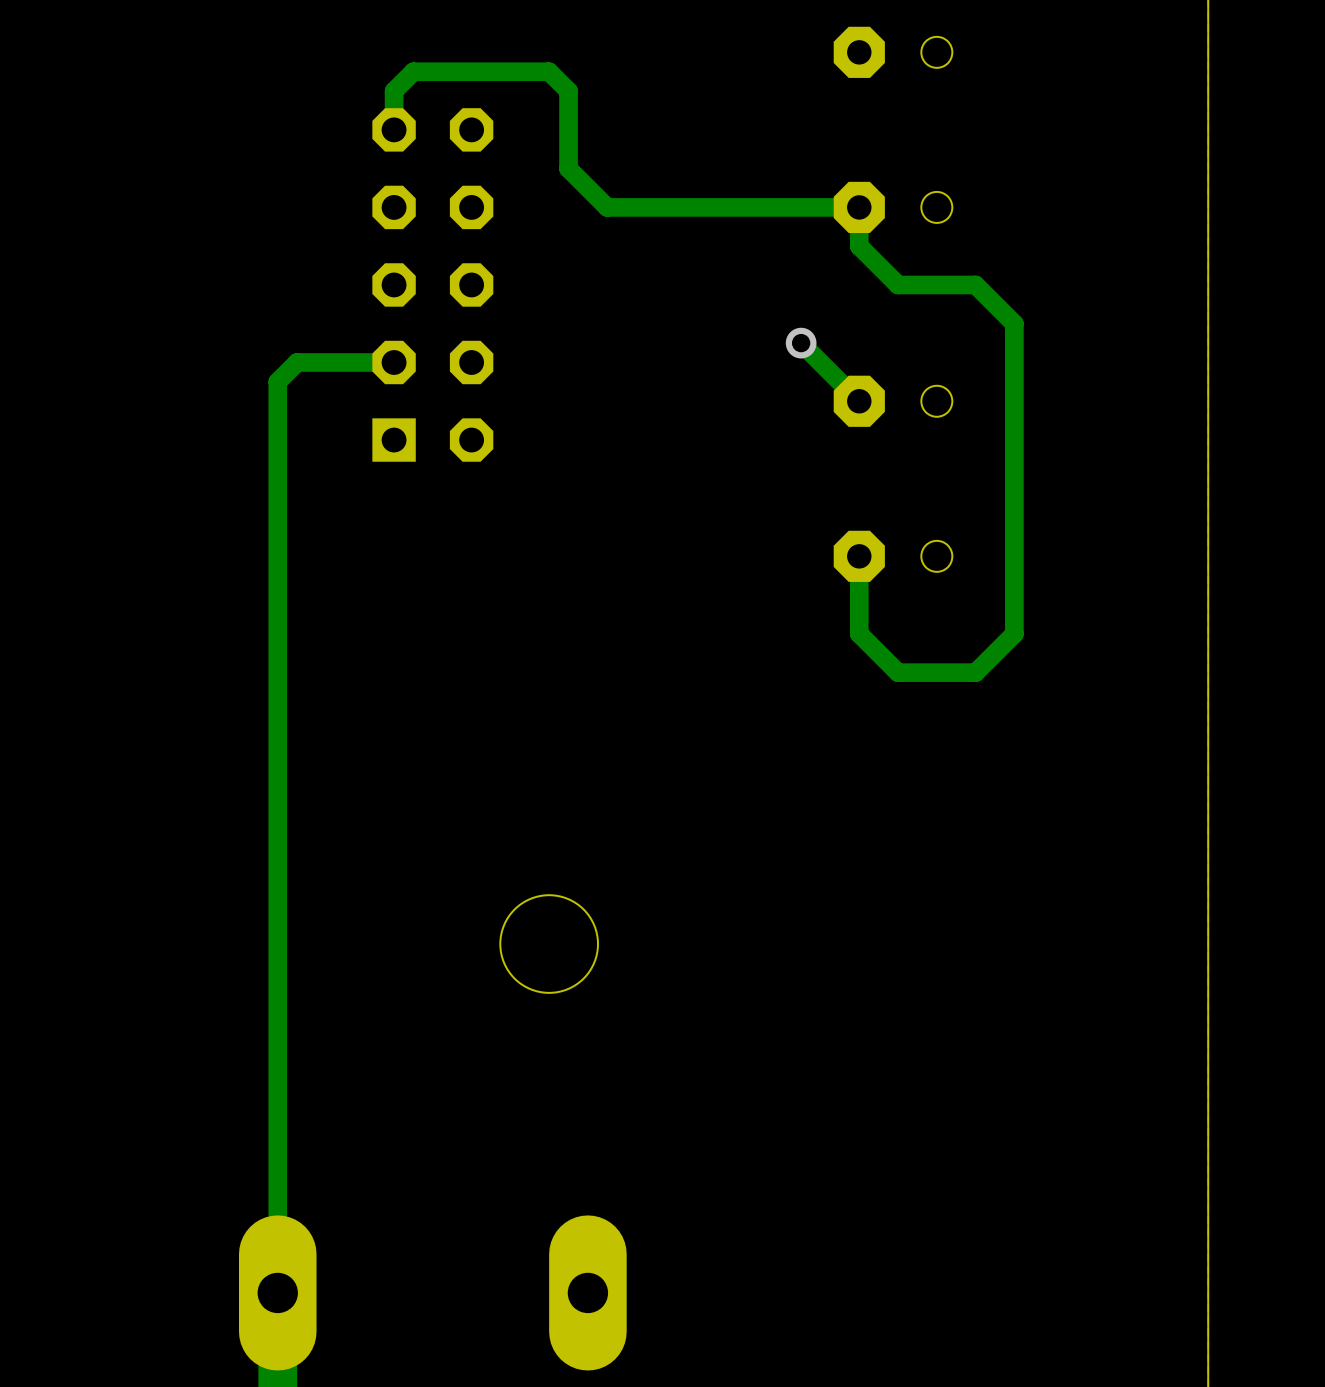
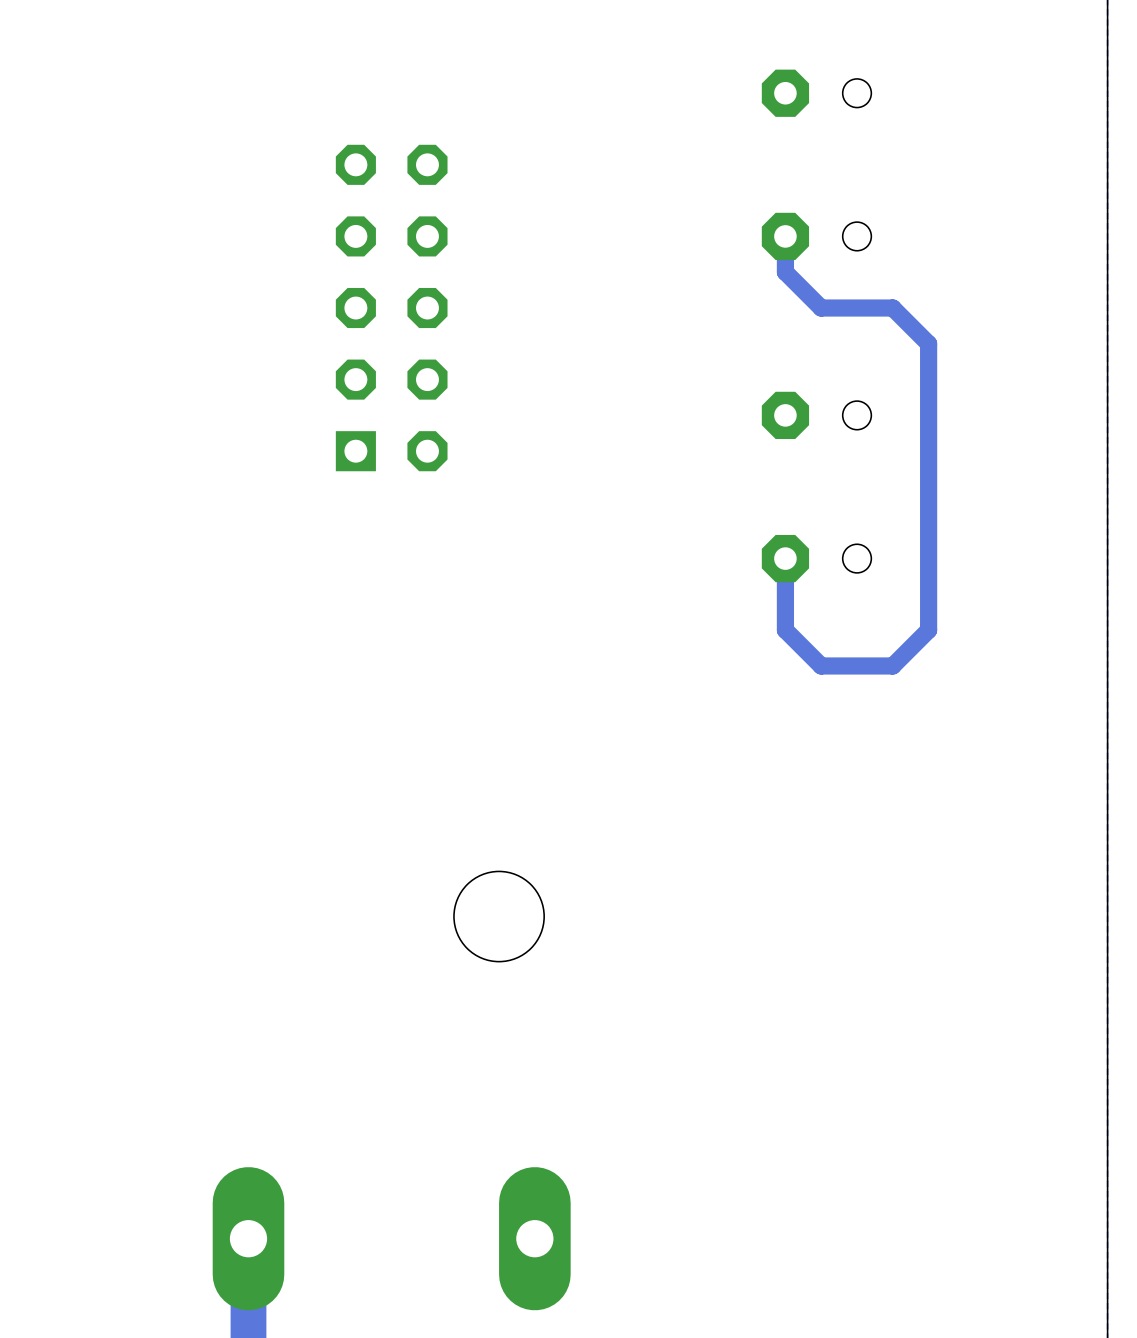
track: (394, 129) (394, 91) (413, 71) (549, 71) (568, 91) (568, 168) (607, 207) (859, 207) -> none
track: (801, 343) (859, 401) -> none
via: (801, 343) -> none
track: (394, 362) (297, 362) (277, 381) (277, 1292) -> none

